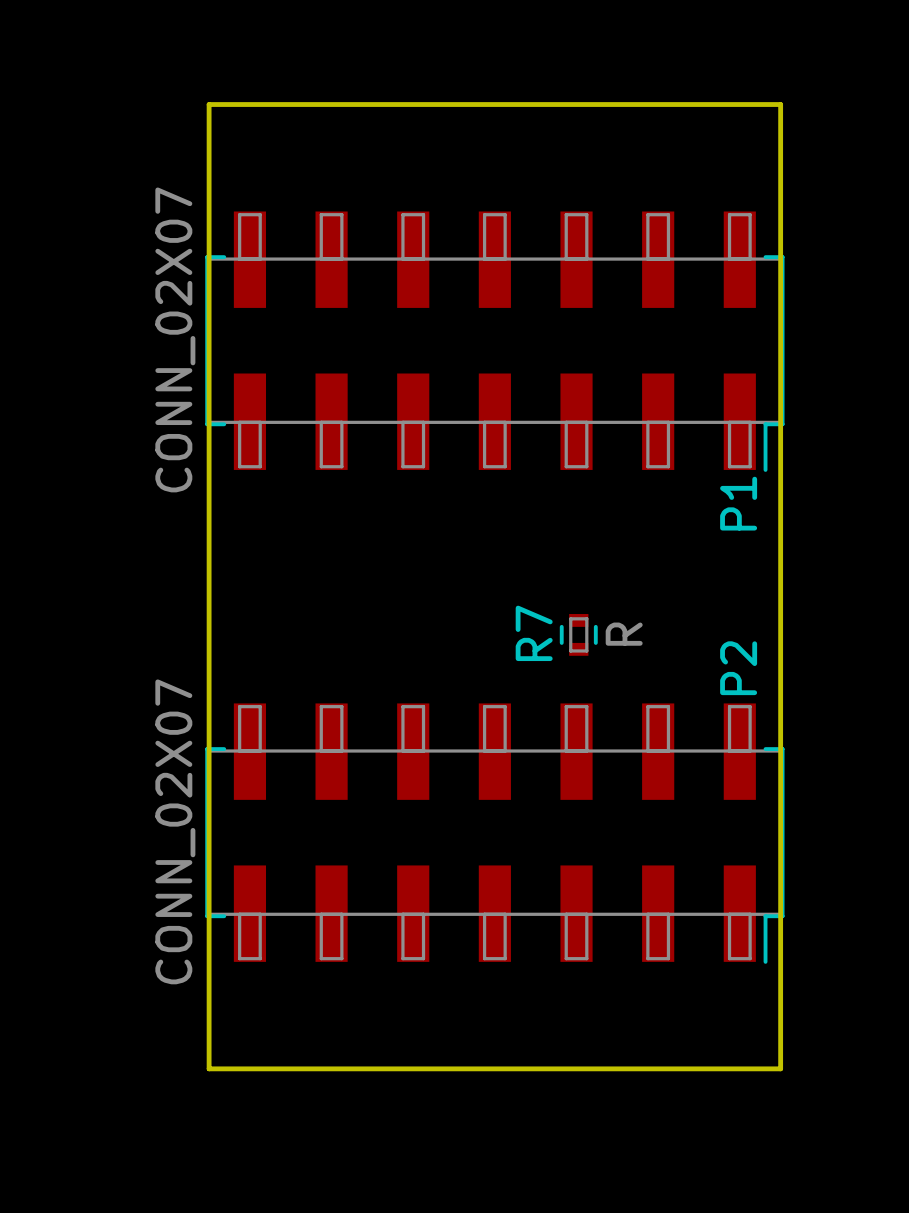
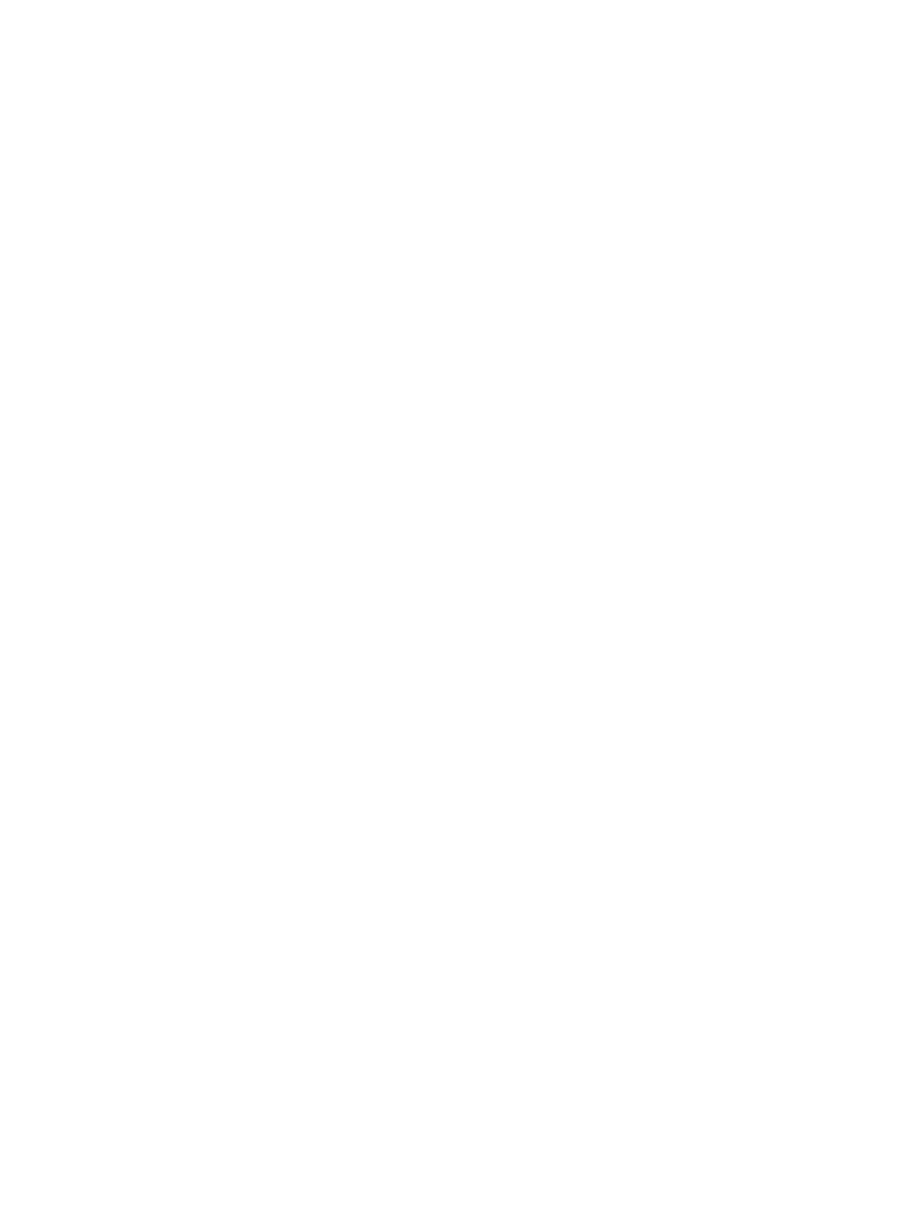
board edge: (209, 104) (780, 104) (780, 1068) (209, 1068) (209, 104) -> none
P1: CONN_02X07 (494, 341) -> none
R7: R (578, 634) -> none
P2: CONN_02X07 (494, 833) -> none

